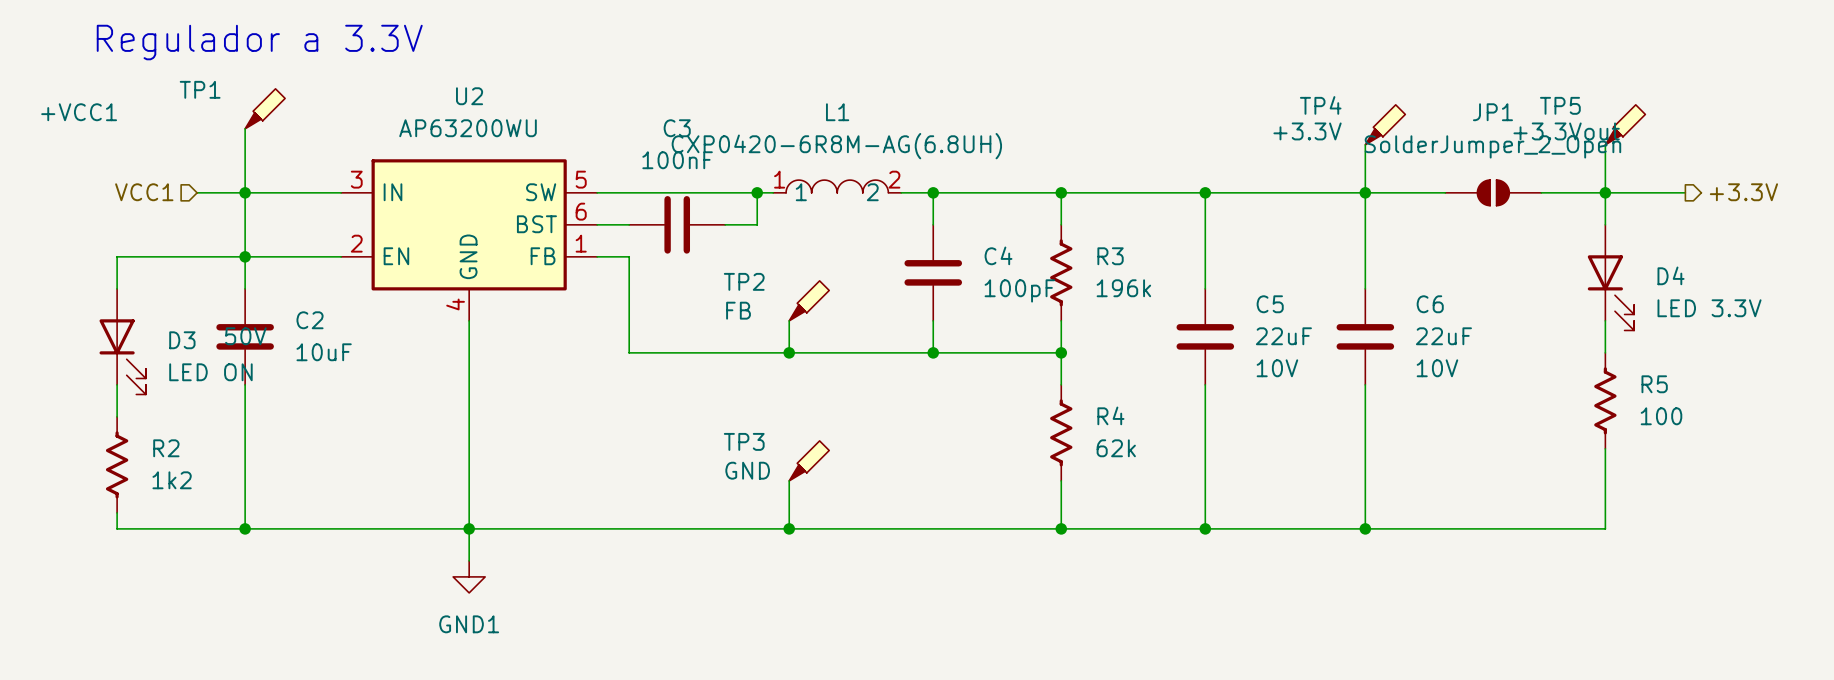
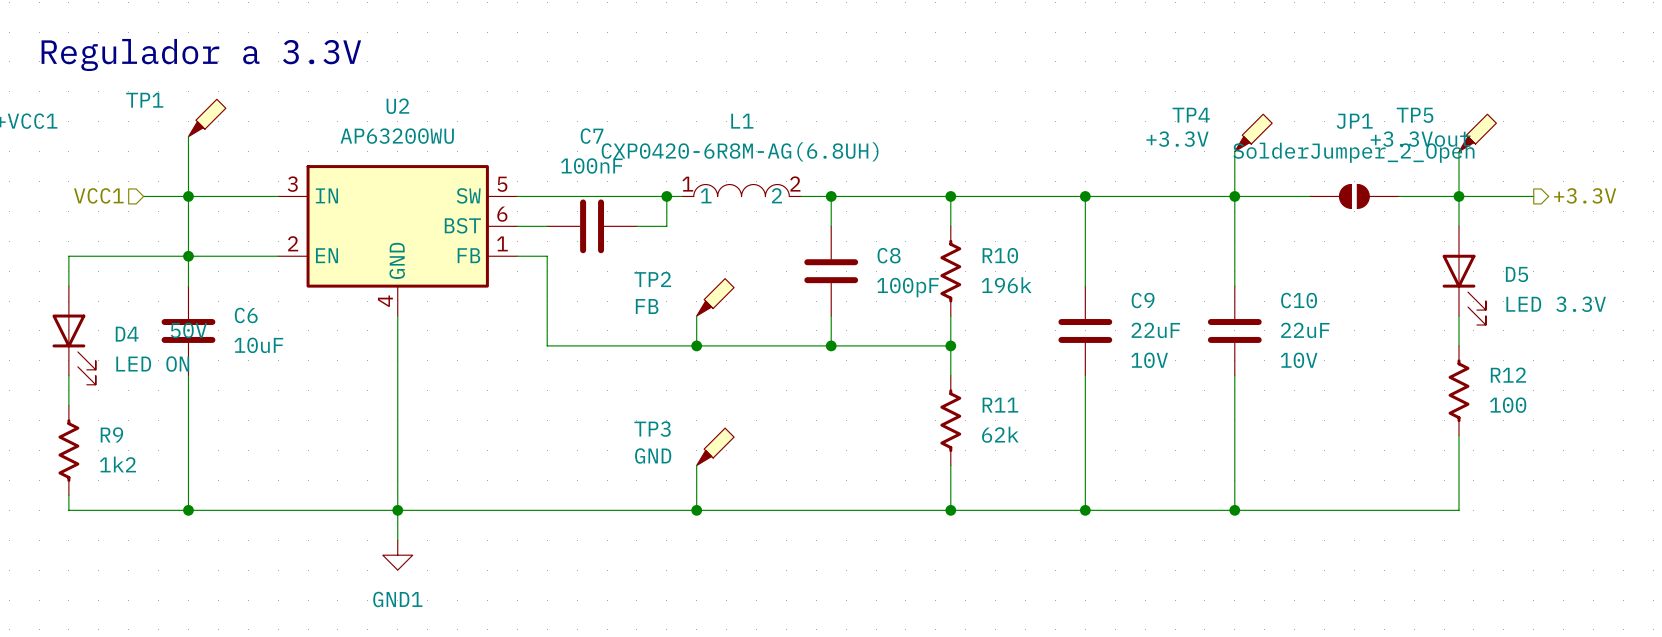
C3 name: C3 (677, 128) -> C7 (592, 136)
C4 name: C4 (998, 255) -> C8 (889, 255)
R3 name: R3 (1110, 256) -> R10 (1000, 255)
D4 name: D4 (1671, 275) -> D5 (1517, 274)
C5 name: C5 (1270, 304) -> C9 (1143, 300)
C6 name: C6 (1430, 304) -> C10 (1299, 300)
C2 name: C2 (310, 320) -> C6 (246, 315)
D3 name: D3 (182, 340) -> D4 (127, 334)
R5 name: R5 (1654, 384) -> R12 (1508, 375)
R4 name: R4 (1110, 415) -> R11 (1000, 405)
R2 name: R2 (166, 448) -> R9 (111, 434)

